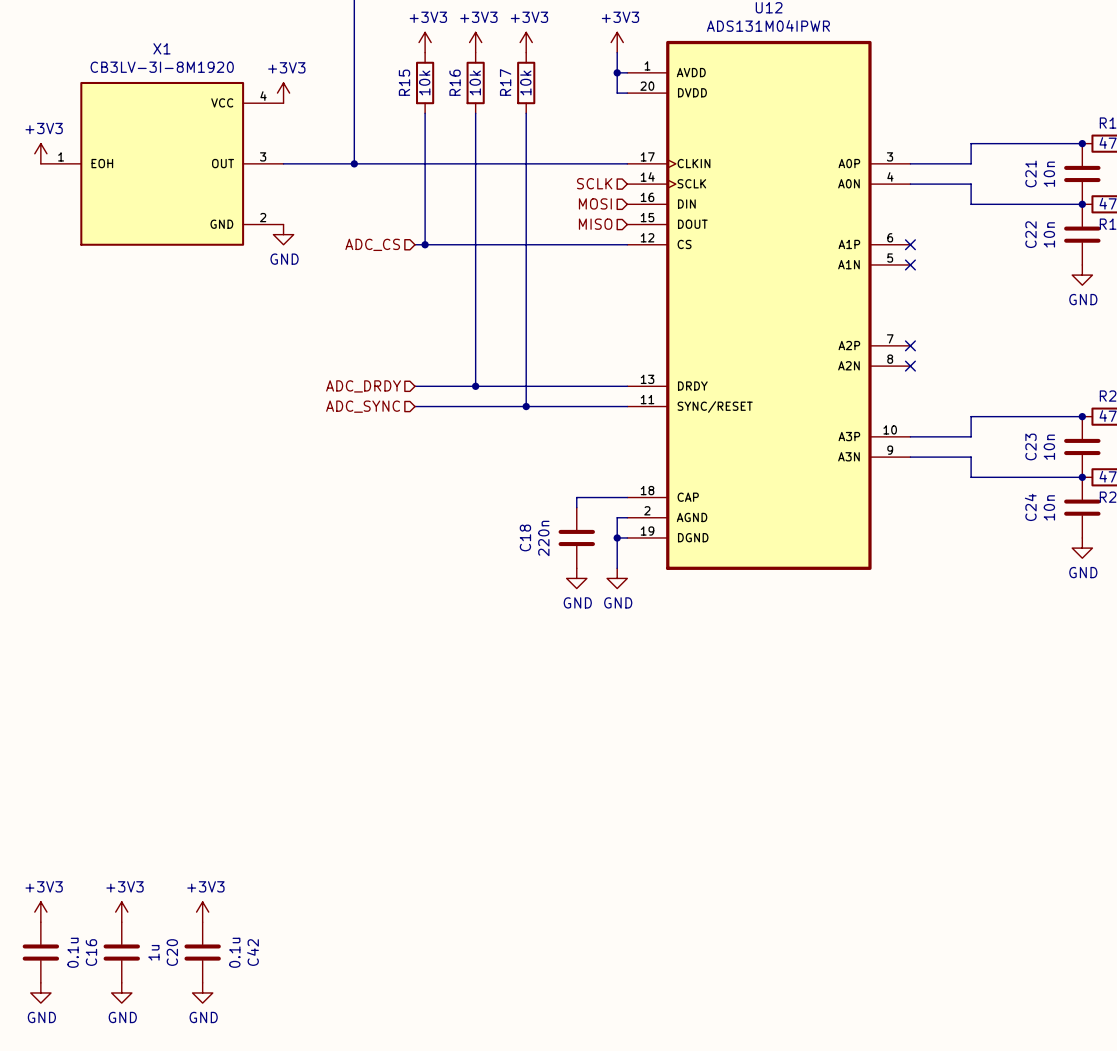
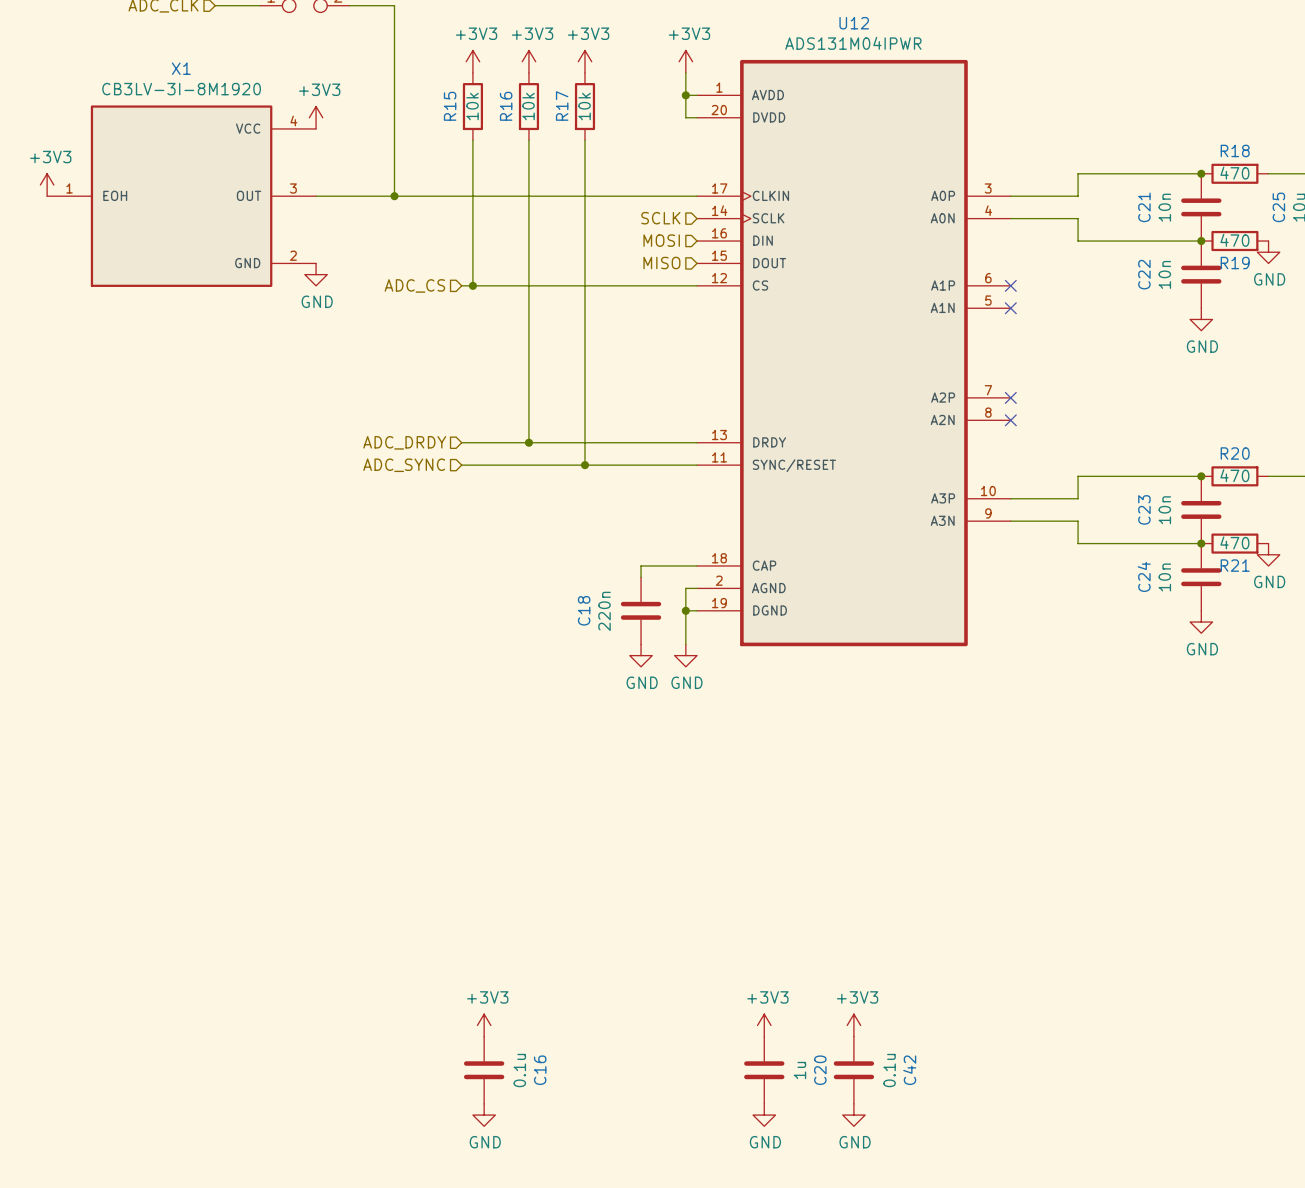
power symbol: +3V3 (40, 912) -> none
power symbol: +3V3 (121, 912) -> none
power symbol: +3V3 (202, 912) -> none
power symbol: none -> +3V3 (484, 1025)
power symbol: none -> +3V3 (764, 1025)
power symbol: none -> +3V3 (853, 1025)
C16 position: (40, 952) -> (484, 1070)
C20 position: (121, 952) -> (764, 1070)
C42 position: (202, 952) -> (853, 1070)
power symbol: GND (40, 992) -> none
power symbol: GND (121, 992) -> none
power symbol: GND (202, 992) -> none
power symbol: none -> GND (484, 1115)
power symbol: none -> GND (764, 1115)
power symbol: none -> GND (853, 1115)

